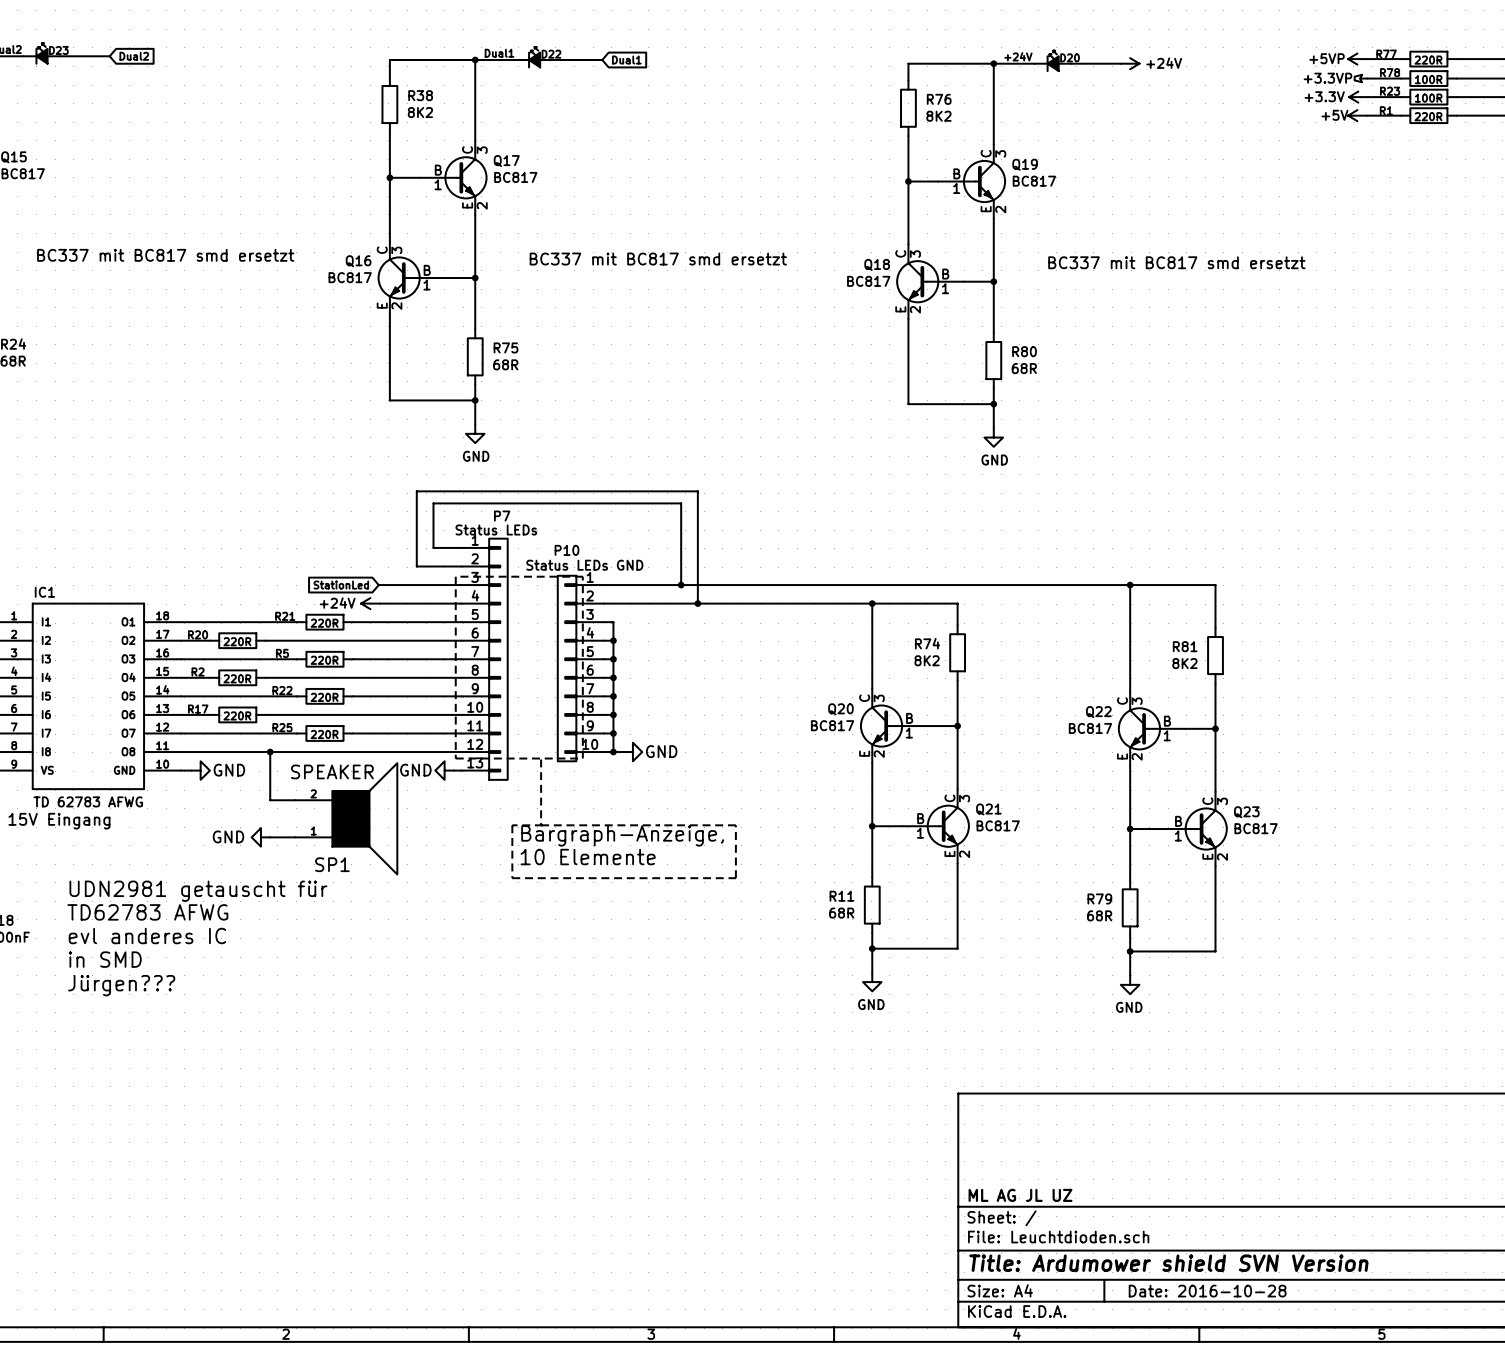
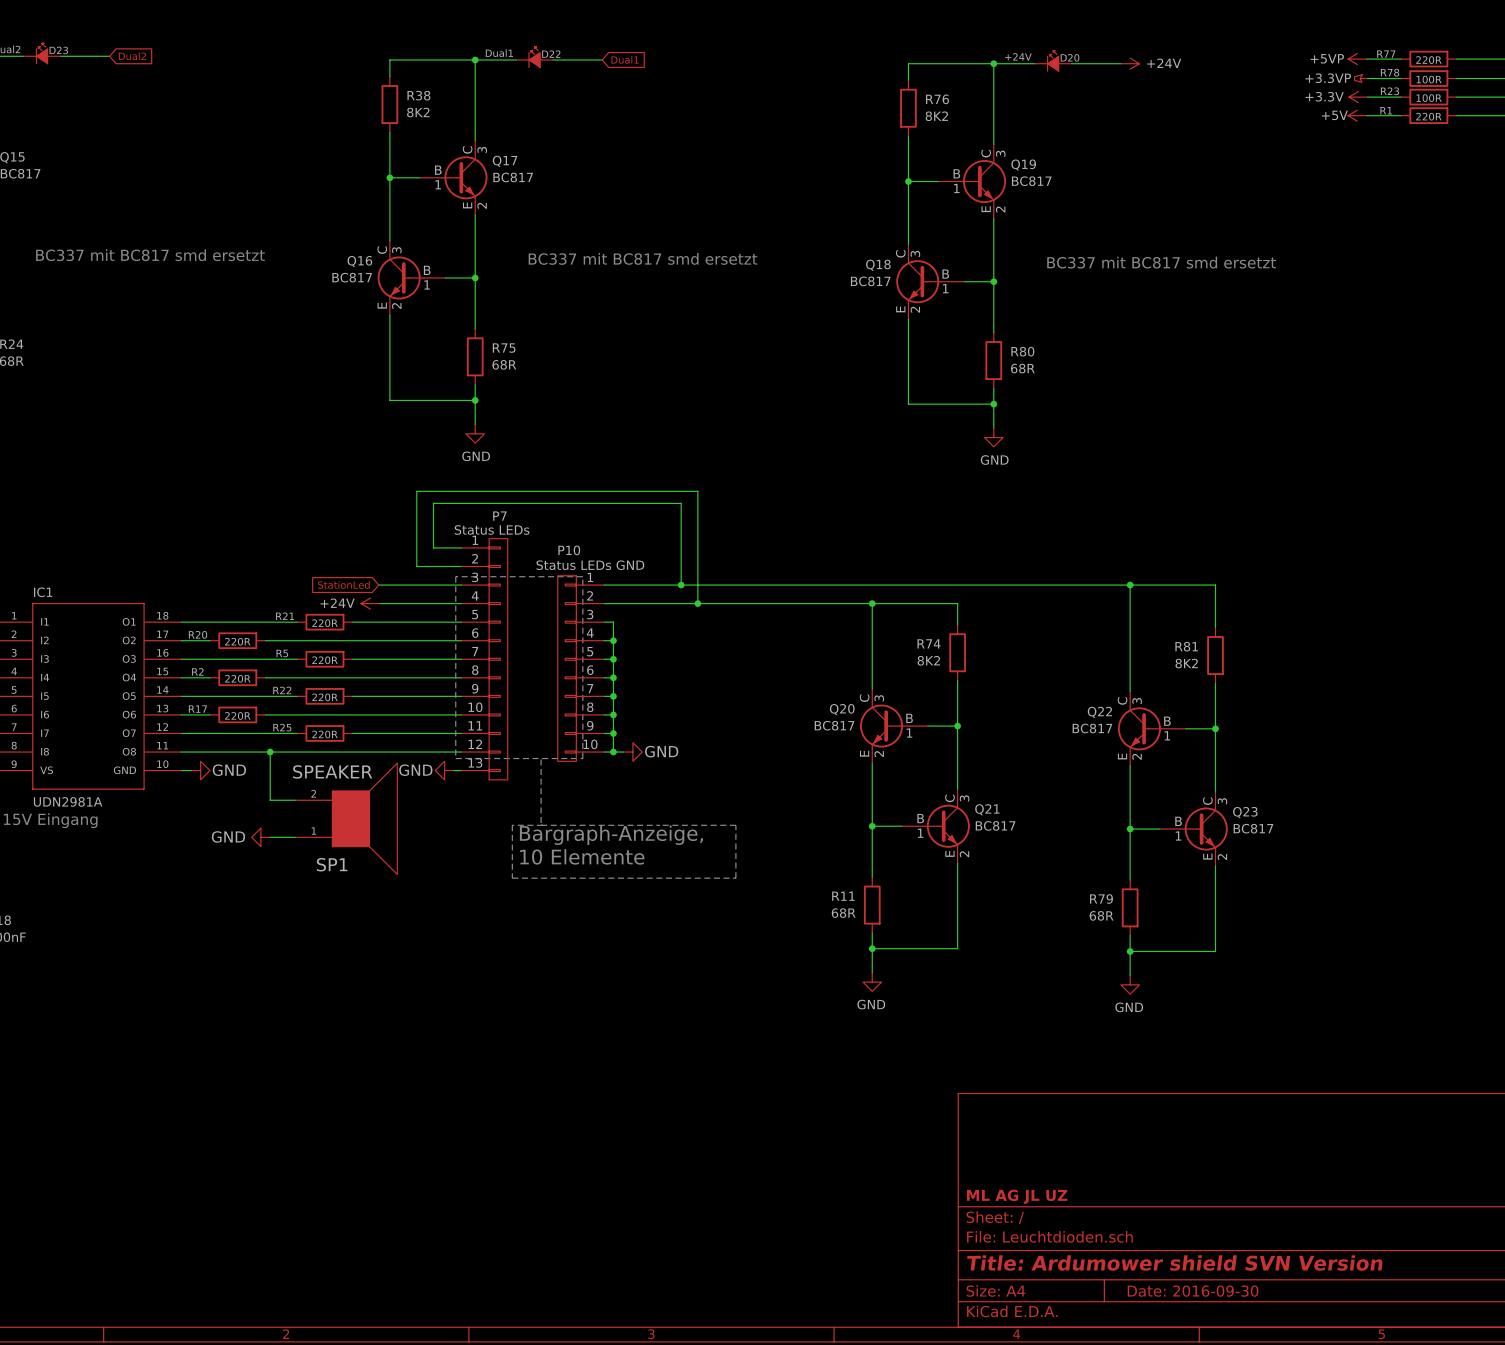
IC1 value: TD 62783 AFWG (88, 801) -> UDN2981A (68, 801)
text: UDN2981 getauscht für (198, 891) -> none
text: TD62783 AFWG (147, 912) -> none
text: evl anderes IC (147, 936) -> none
text: in SMD (105, 959) -> none
text: Jürgen??? (121, 985) -> none
title block: Date: 2016-10-28 (1207, 1291) -> Date: 2016-09-30 (1193, 1291)

